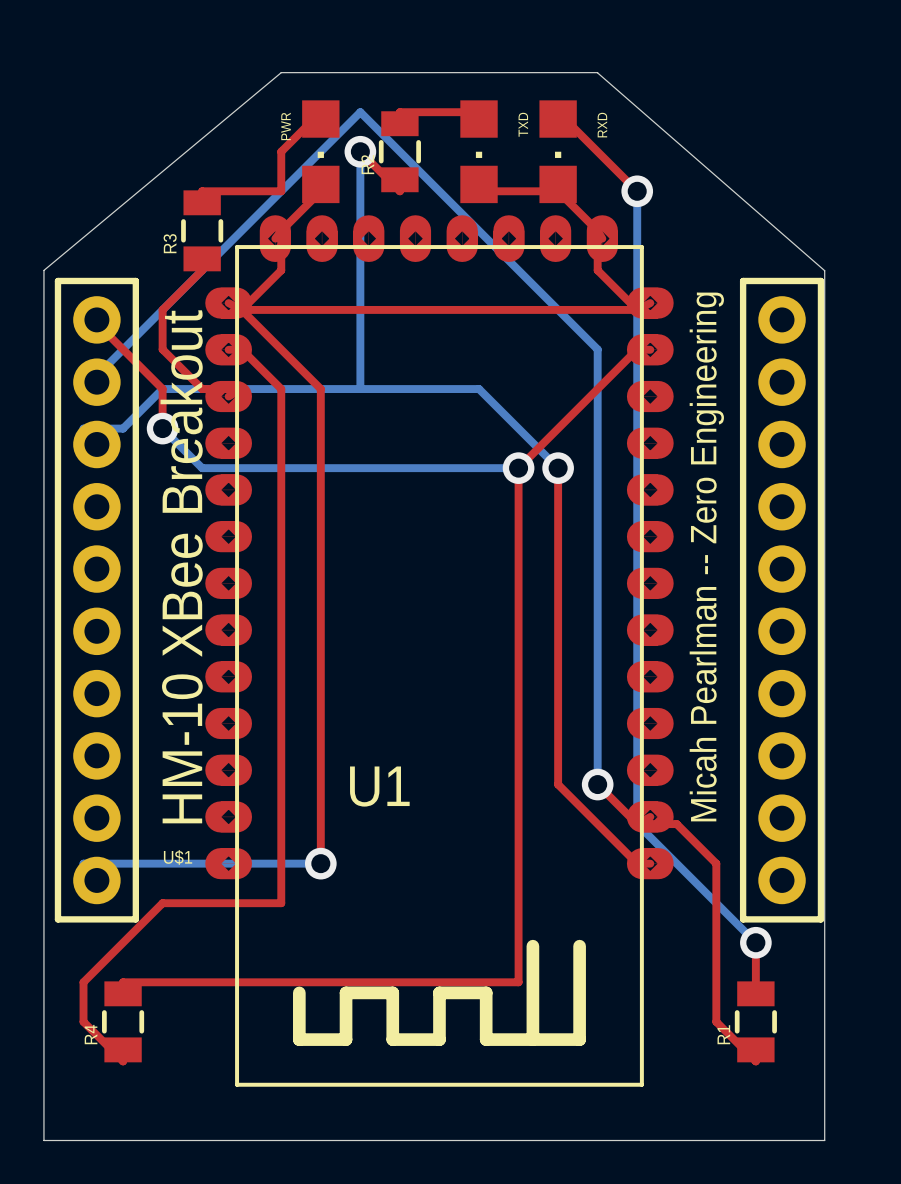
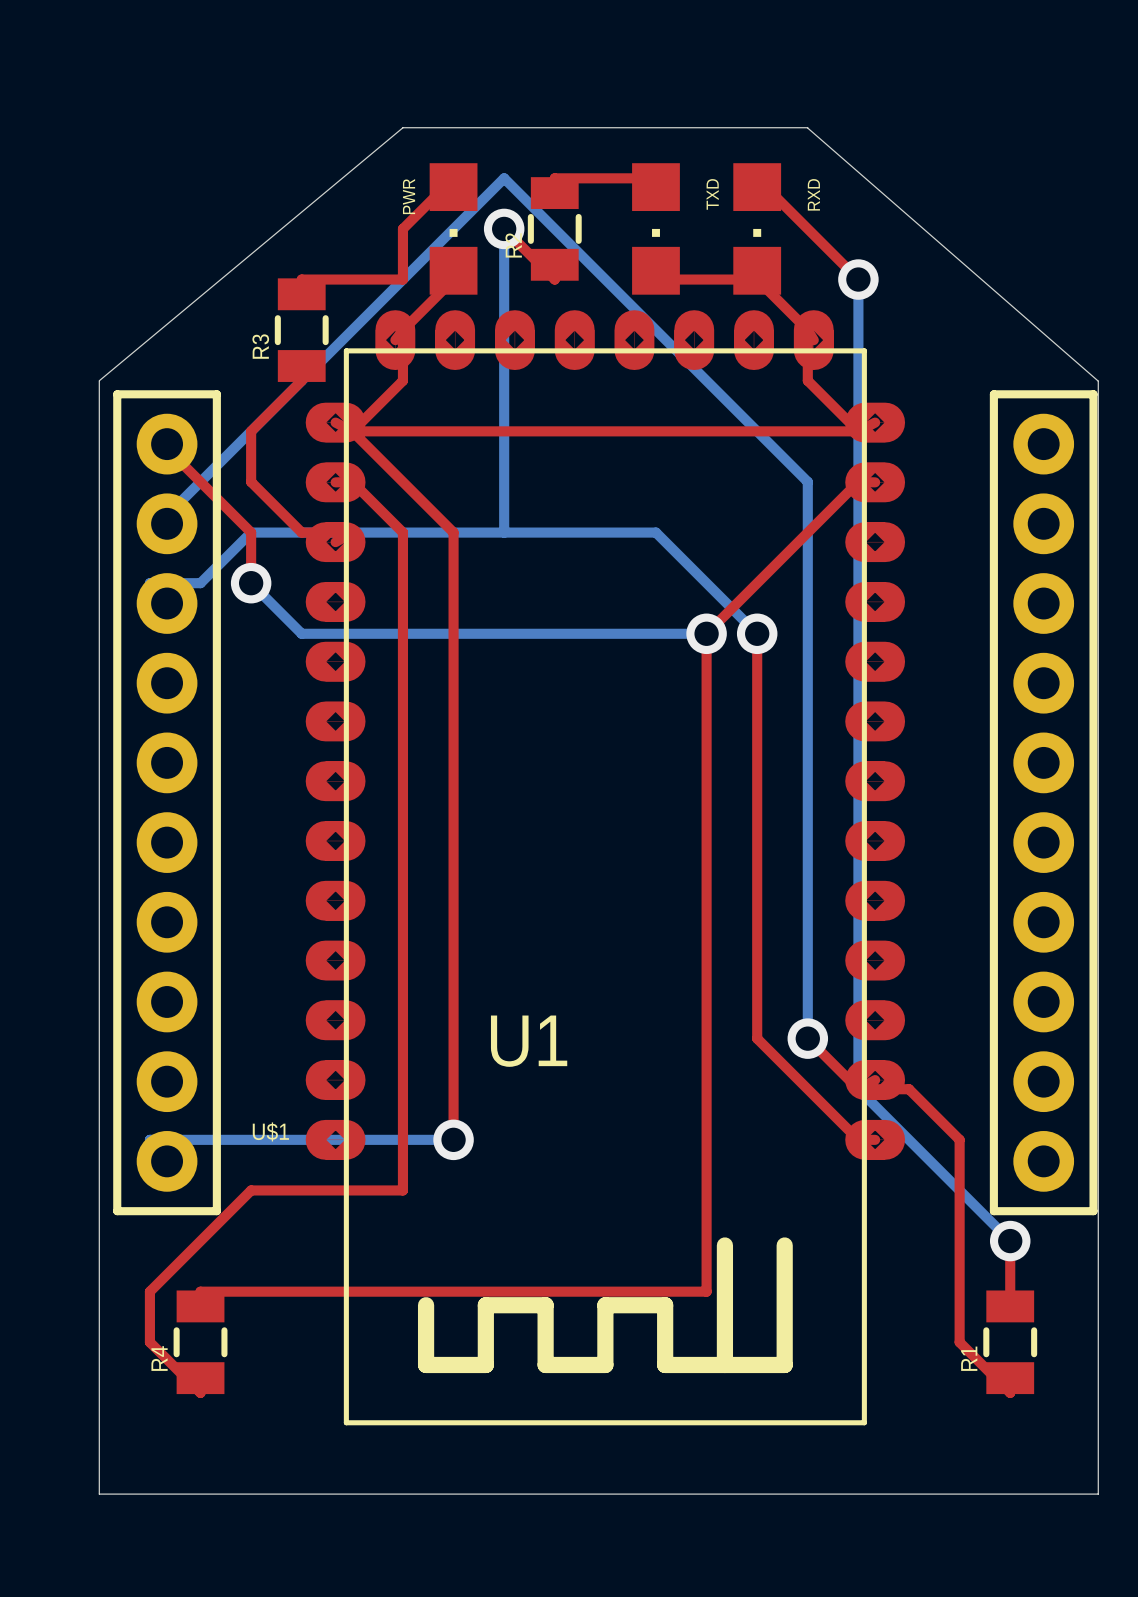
text: Micah Pearlman -- Zero Engineering (706, 556) -> none
text: HM-10 XBee Breakout (181, 566) -> none

